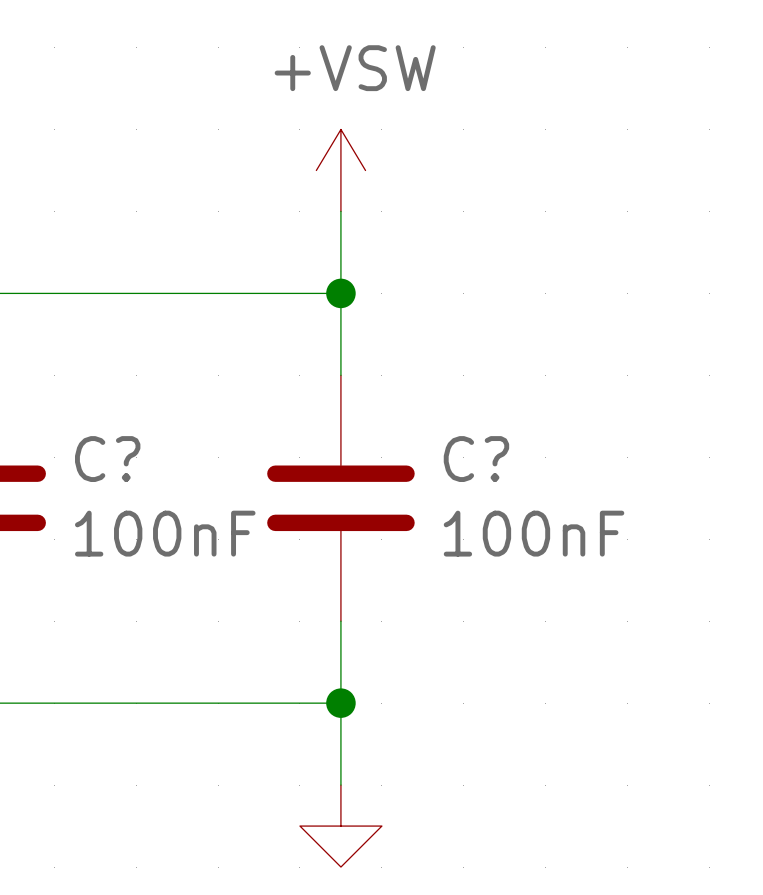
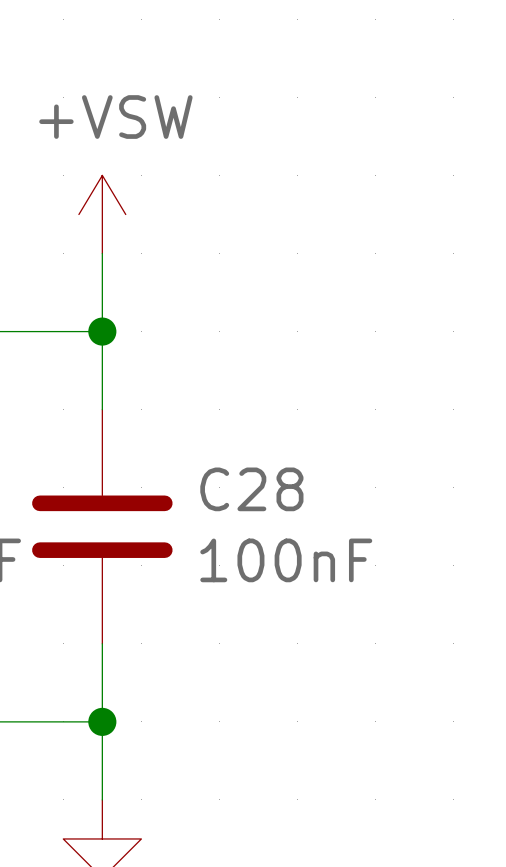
C? name: C? (476, 459) -> C28 (251, 489)

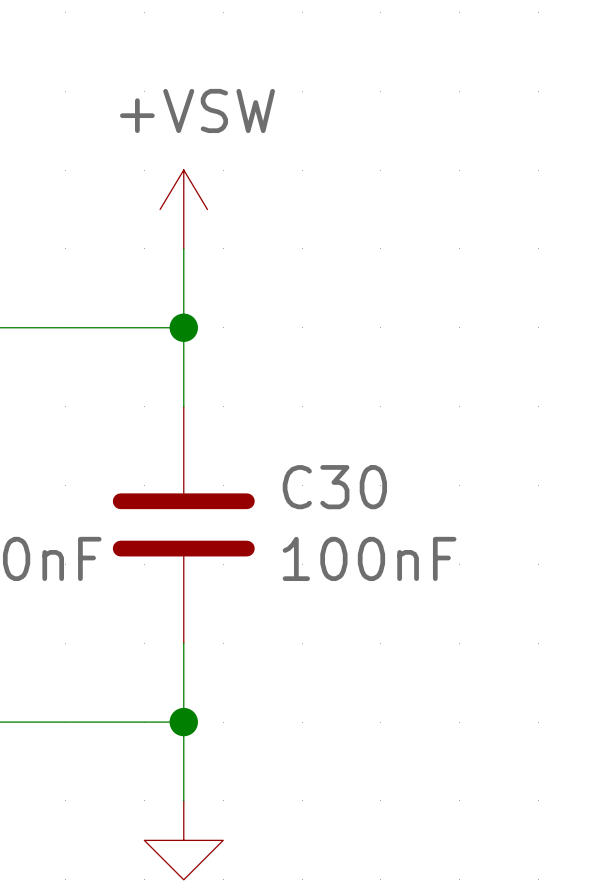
C28 name: C28 (251, 489) -> C30 (334, 487)

